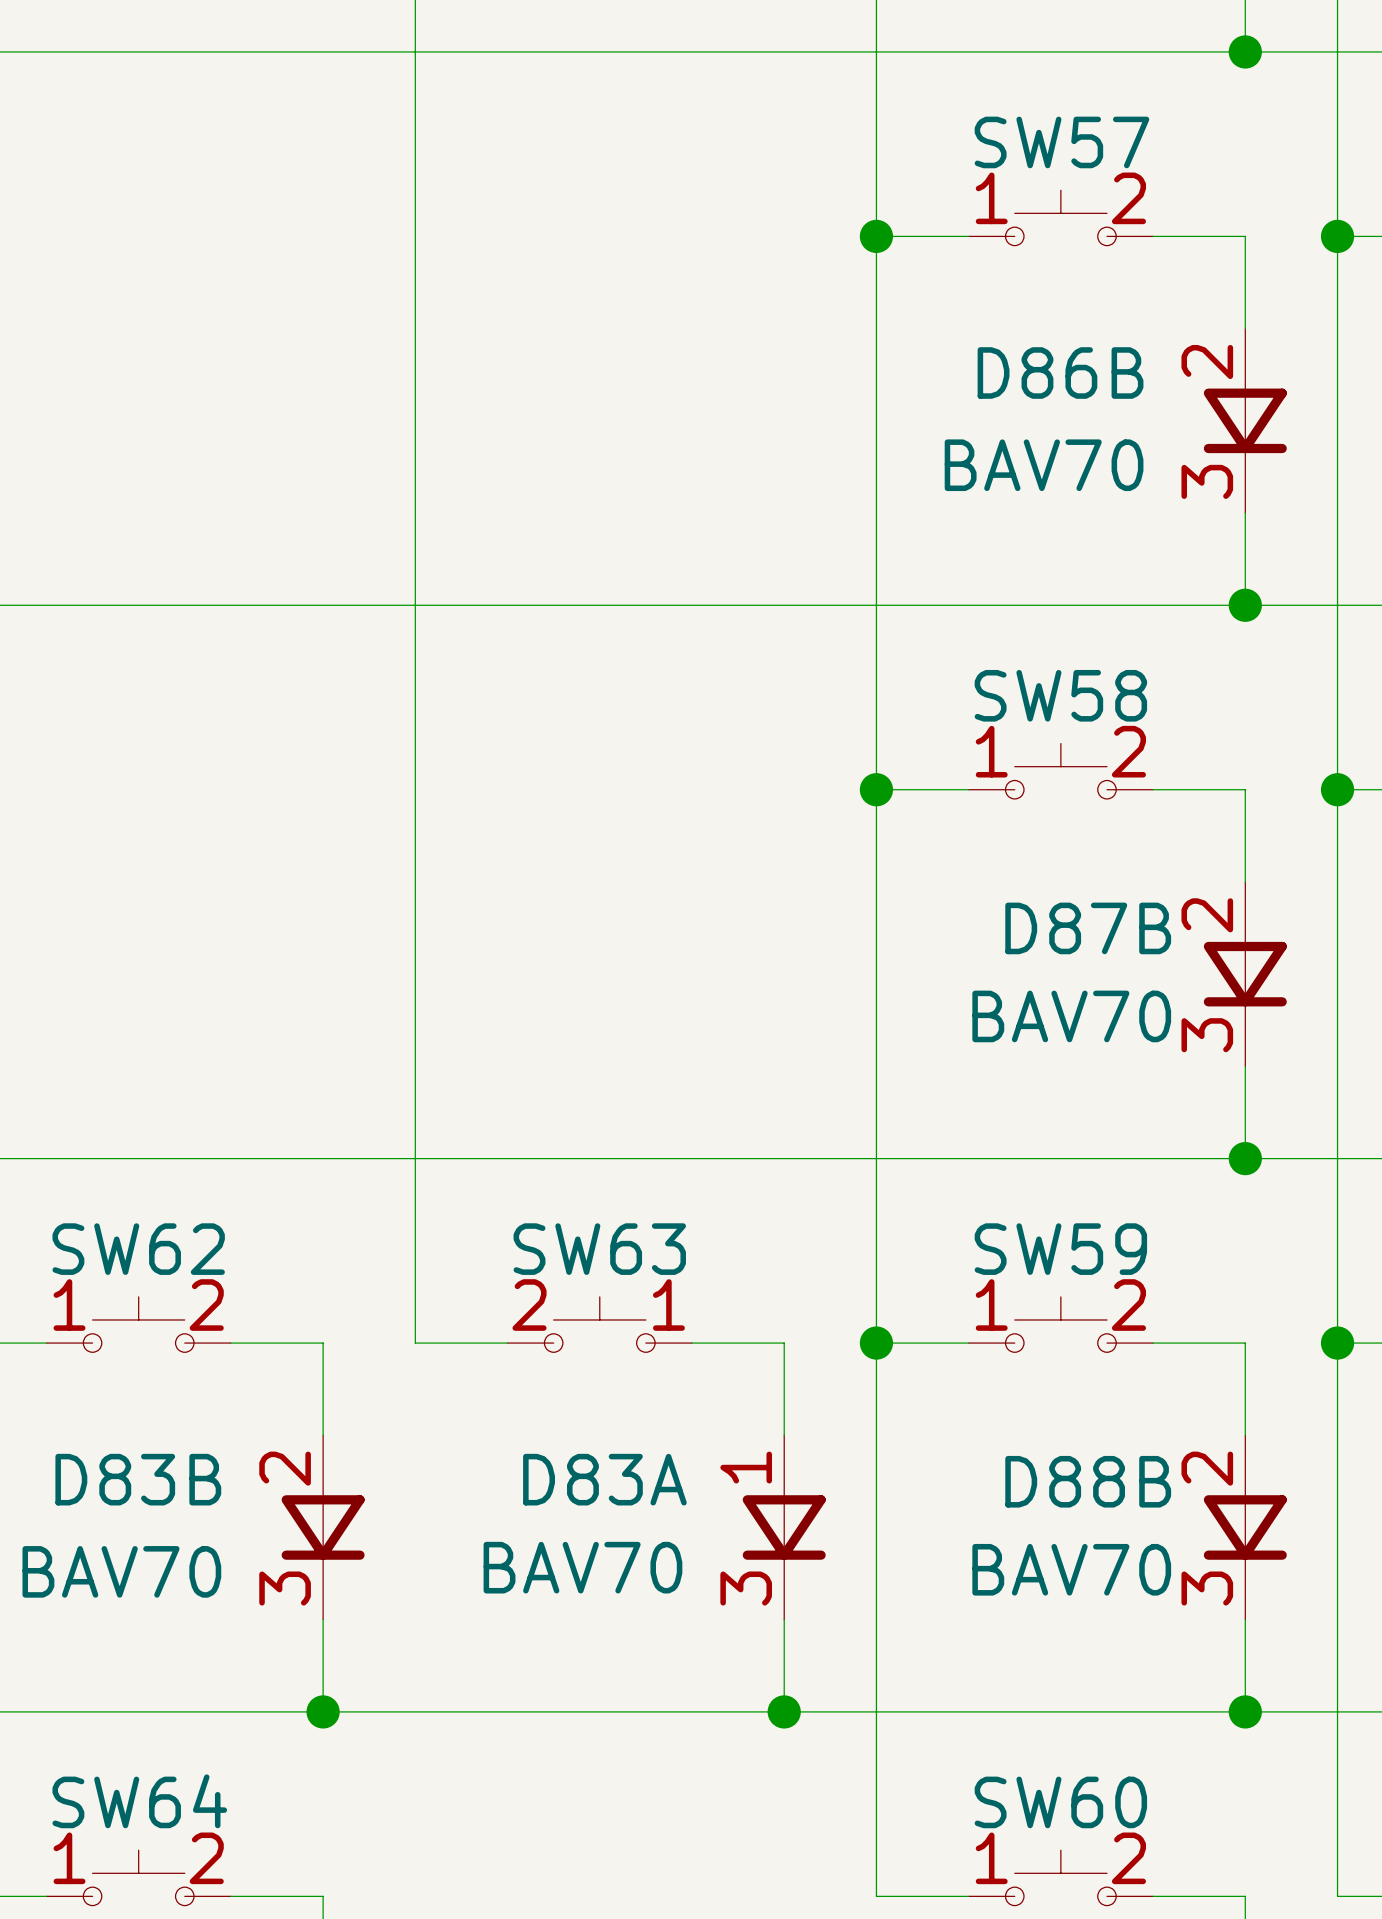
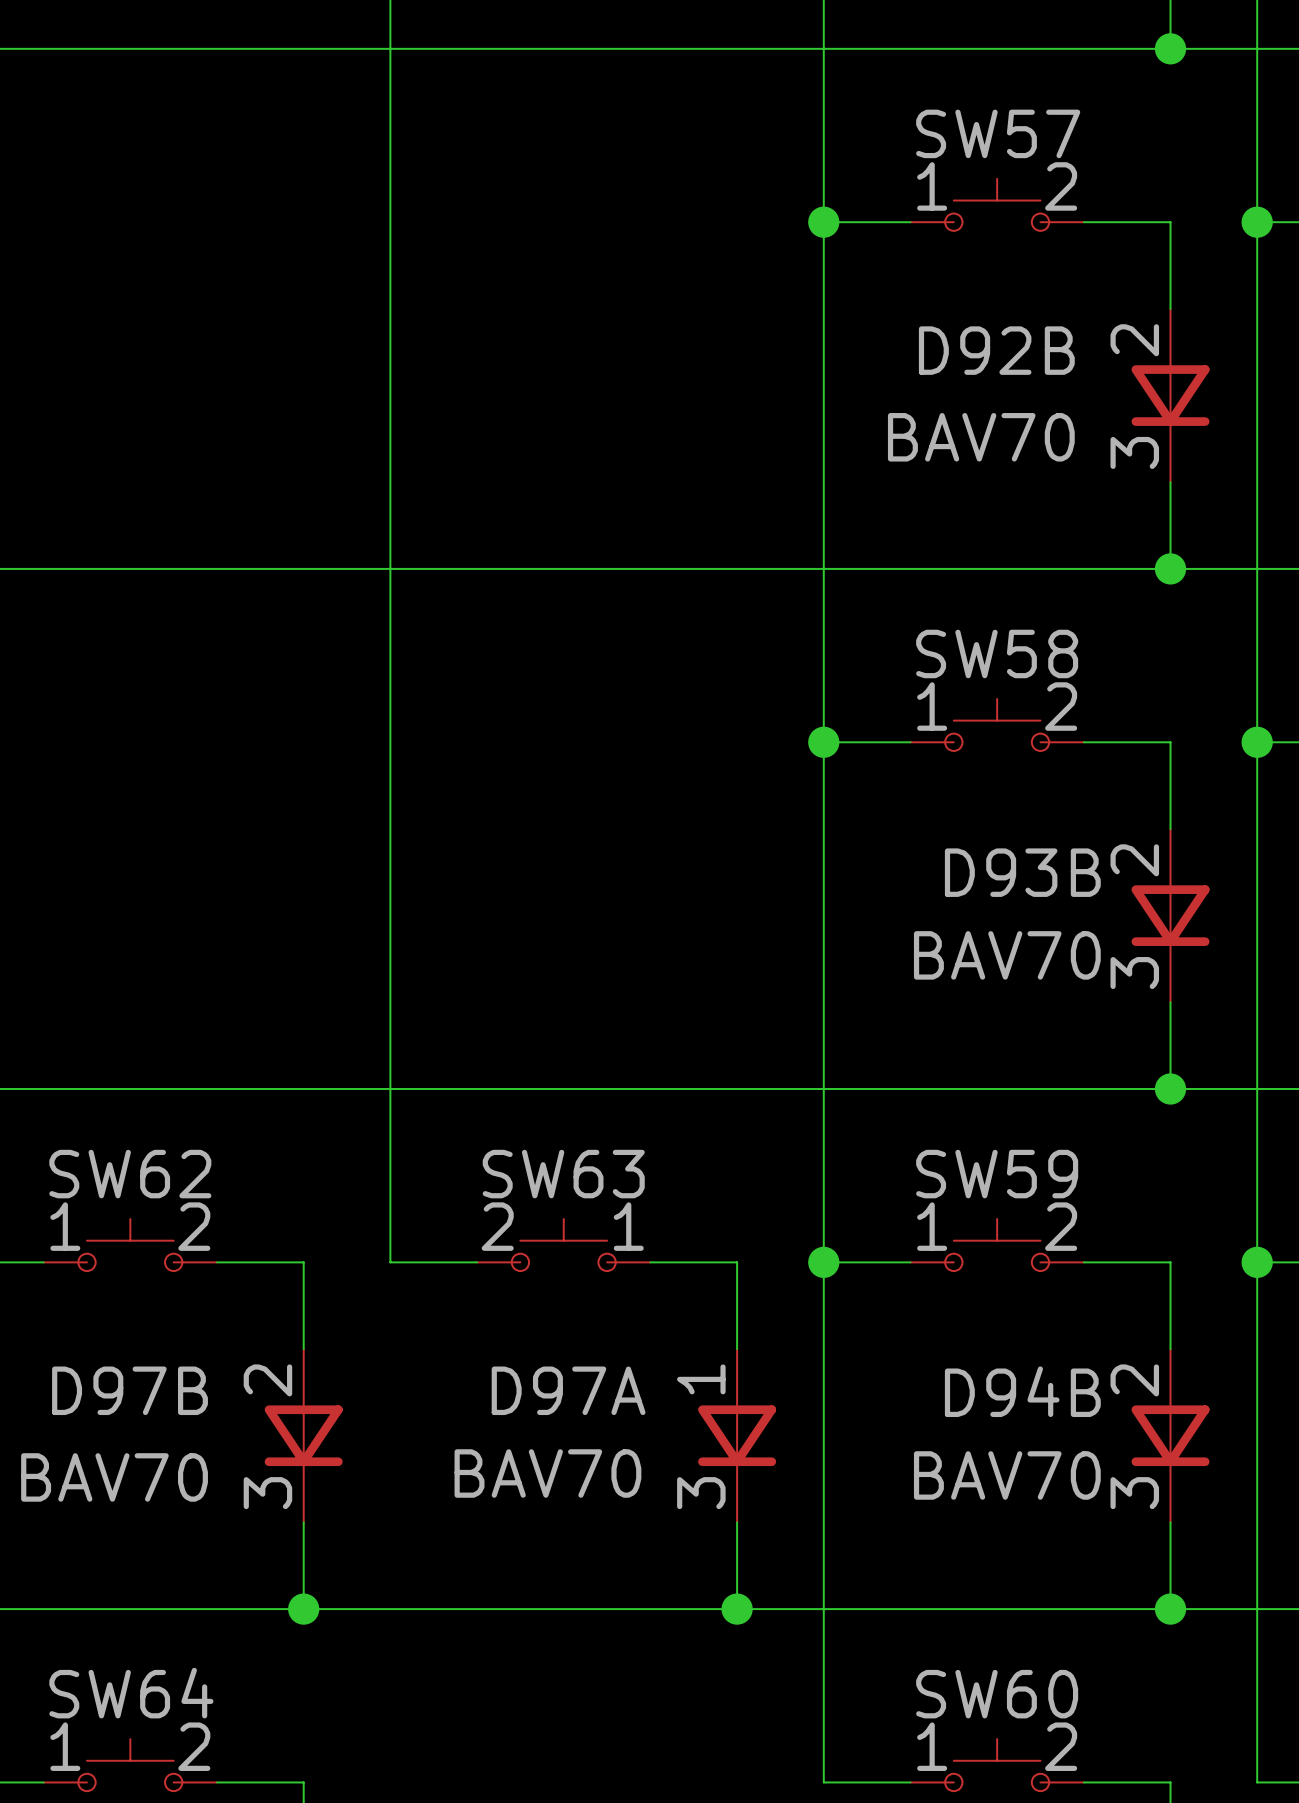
D86B name: D86B (1060, 373) -> D92B (996, 350)
D87B name: D87B (1088, 928) -> D93B (1022, 872)
D83B name: D83B (138, 1479) -> D97B (130, 1390)
D83A name: D83A (604, 1479) -> D97A (568, 1390)
D88B name: D88B (1088, 1481) -> D94B (1022, 1391)

